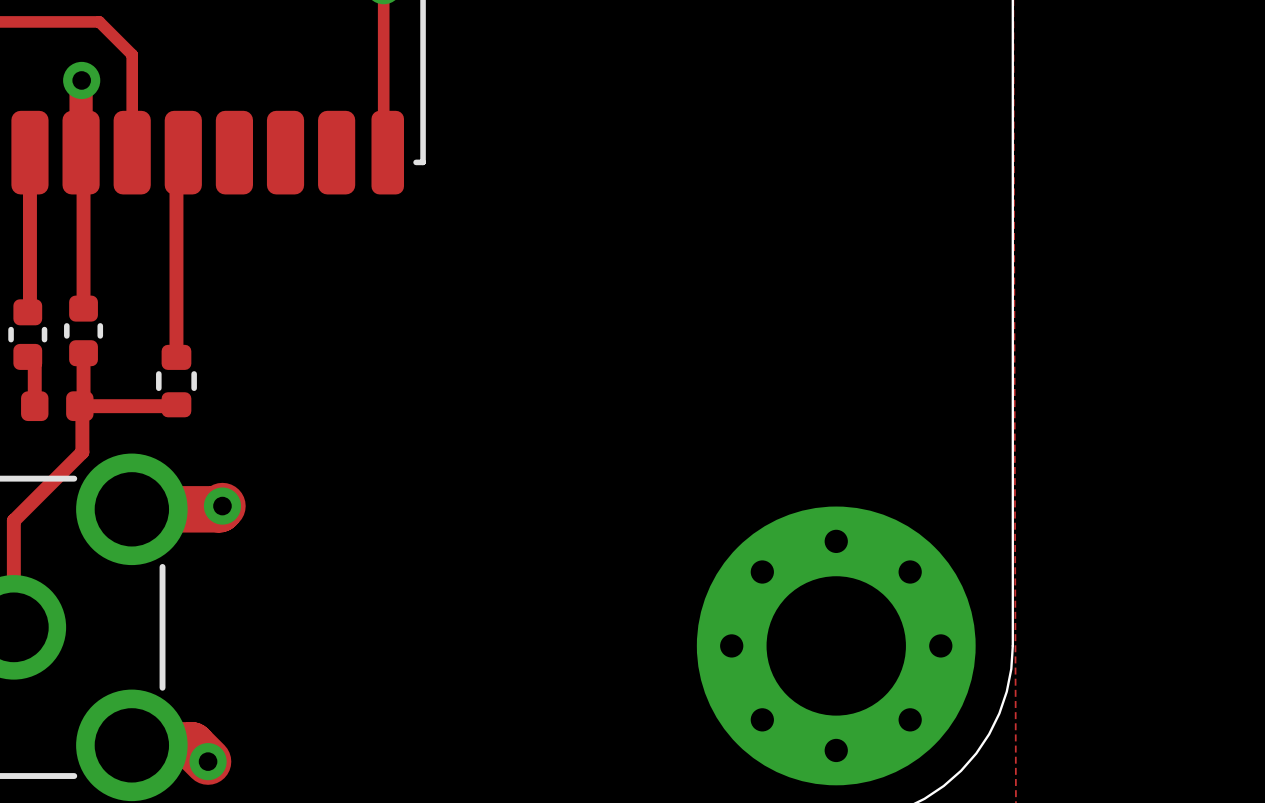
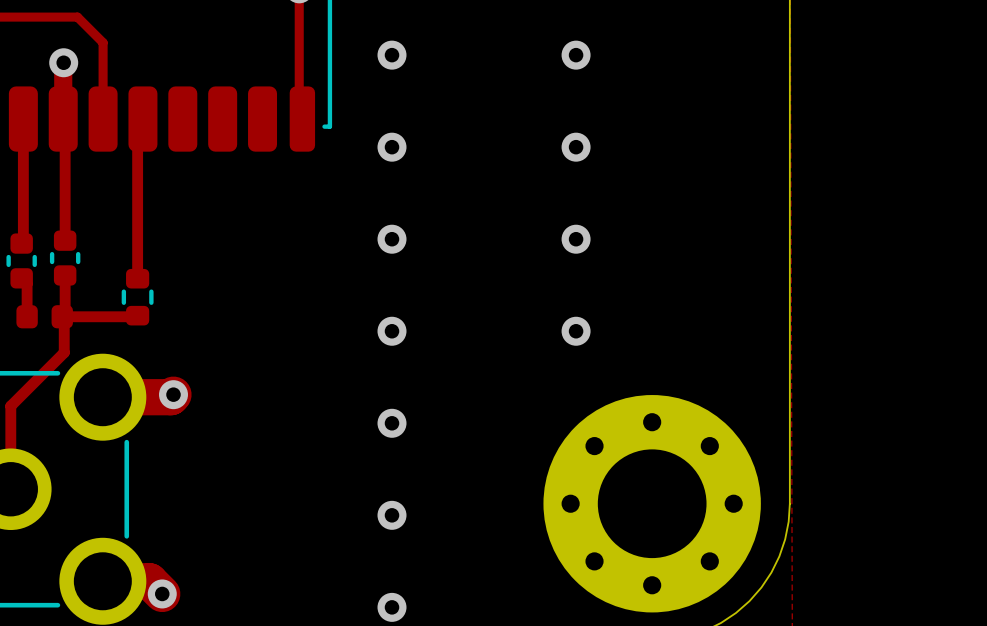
via: none -> (391, 55)
via: none -> (576, 55)
via: none -> (391, 147)
via: none -> (576, 147)
via: none -> (391, 239)
via: none -> (576, 239)
via: none -> (391, 331)
via: none -> (576, 331)
via: none -> (391, 423)
via: none -> (391, 515)
via: none -> (391, 607)

